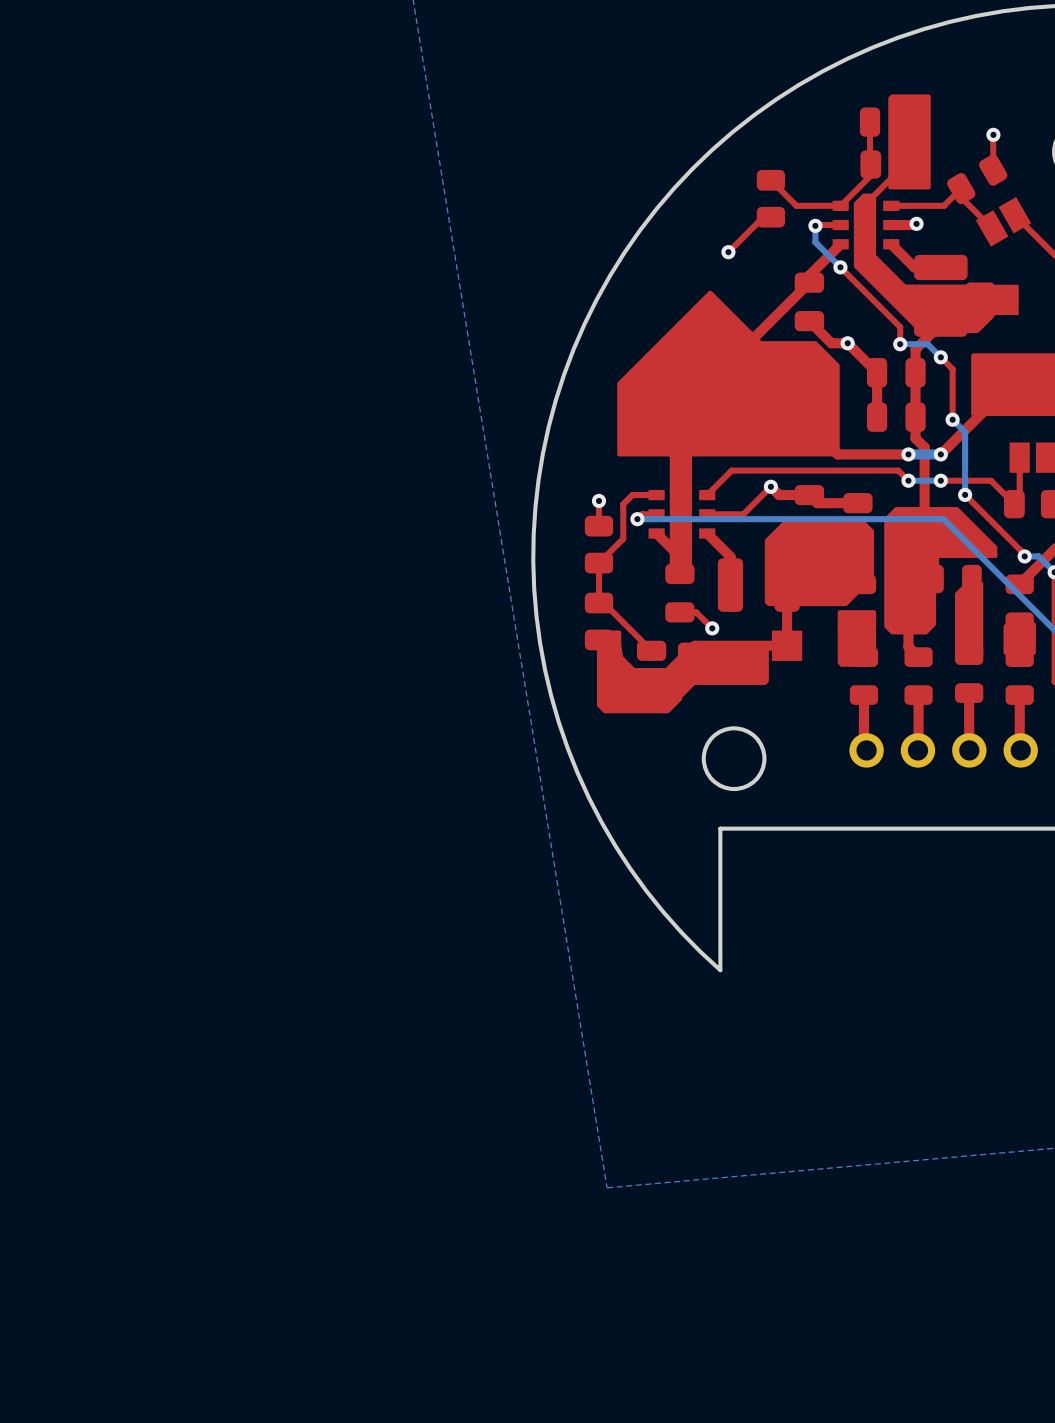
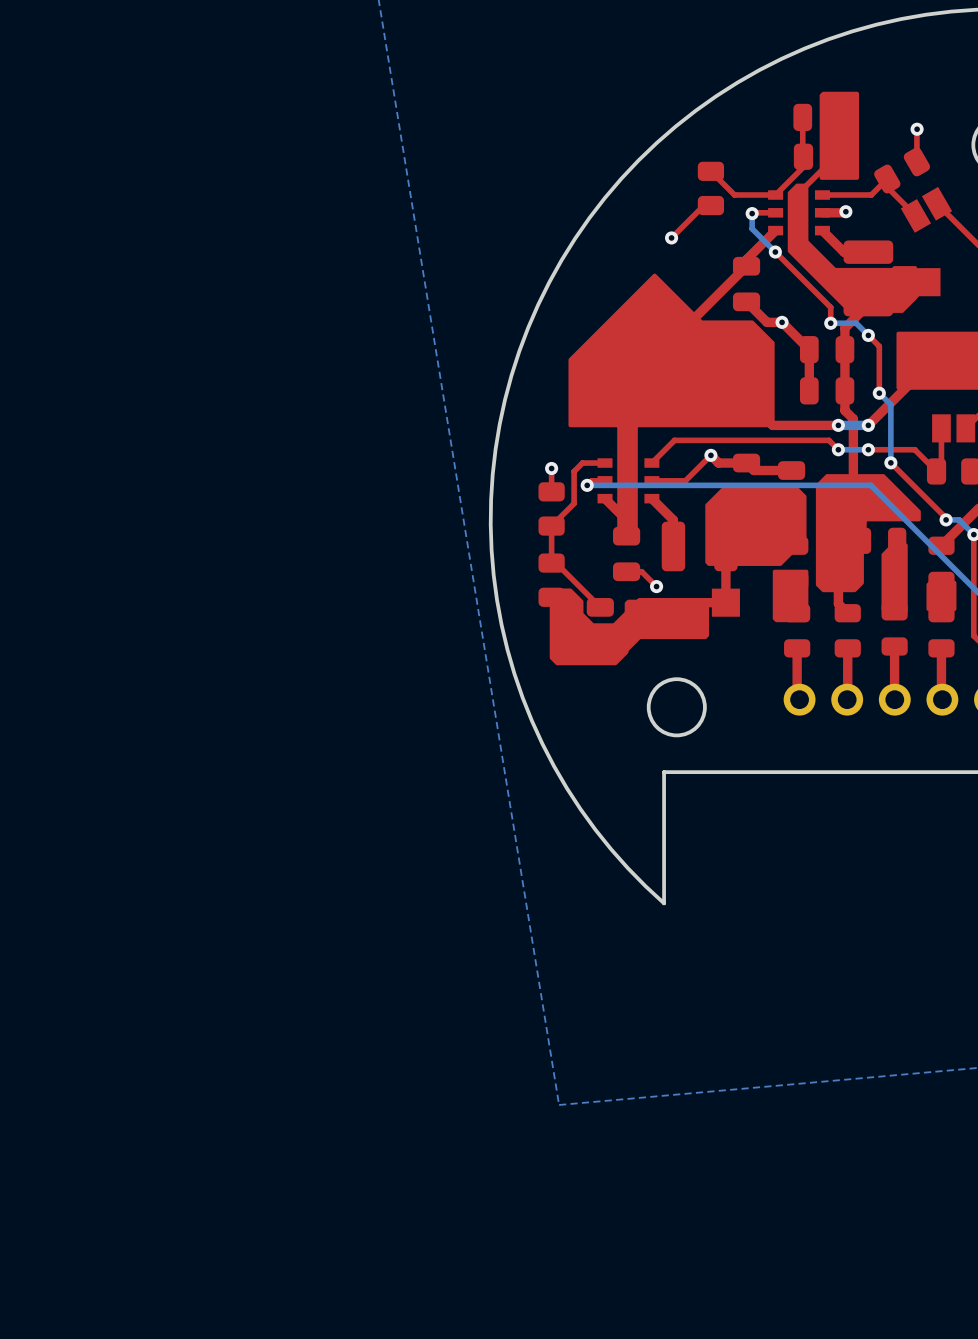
drawing shape: [596, 630, 769, 714] -> [549, 588, 710, 666]

